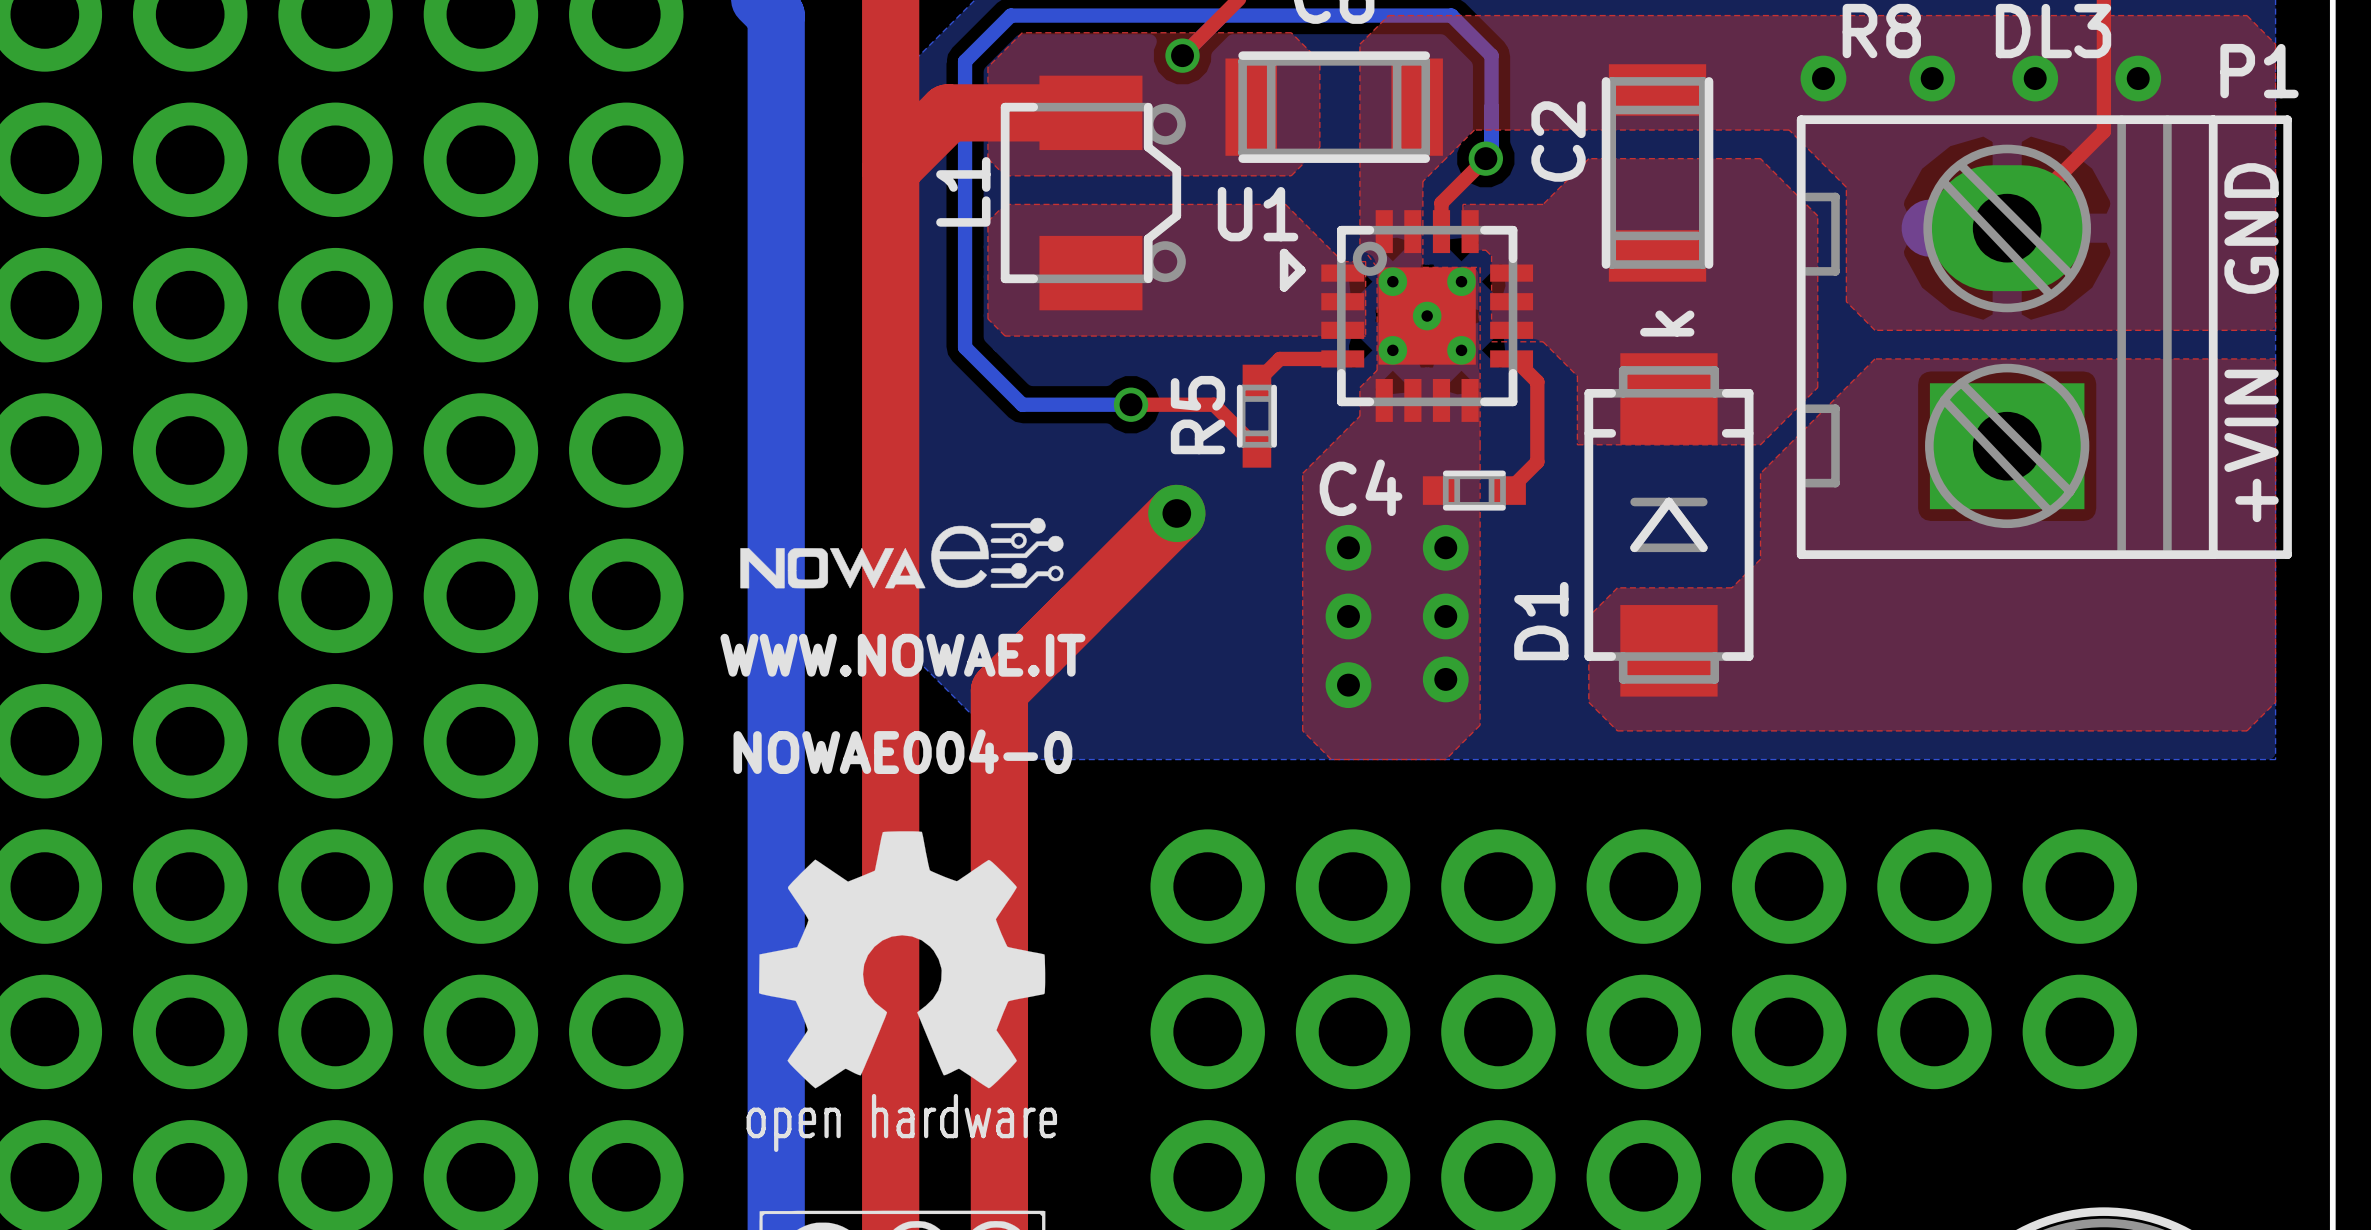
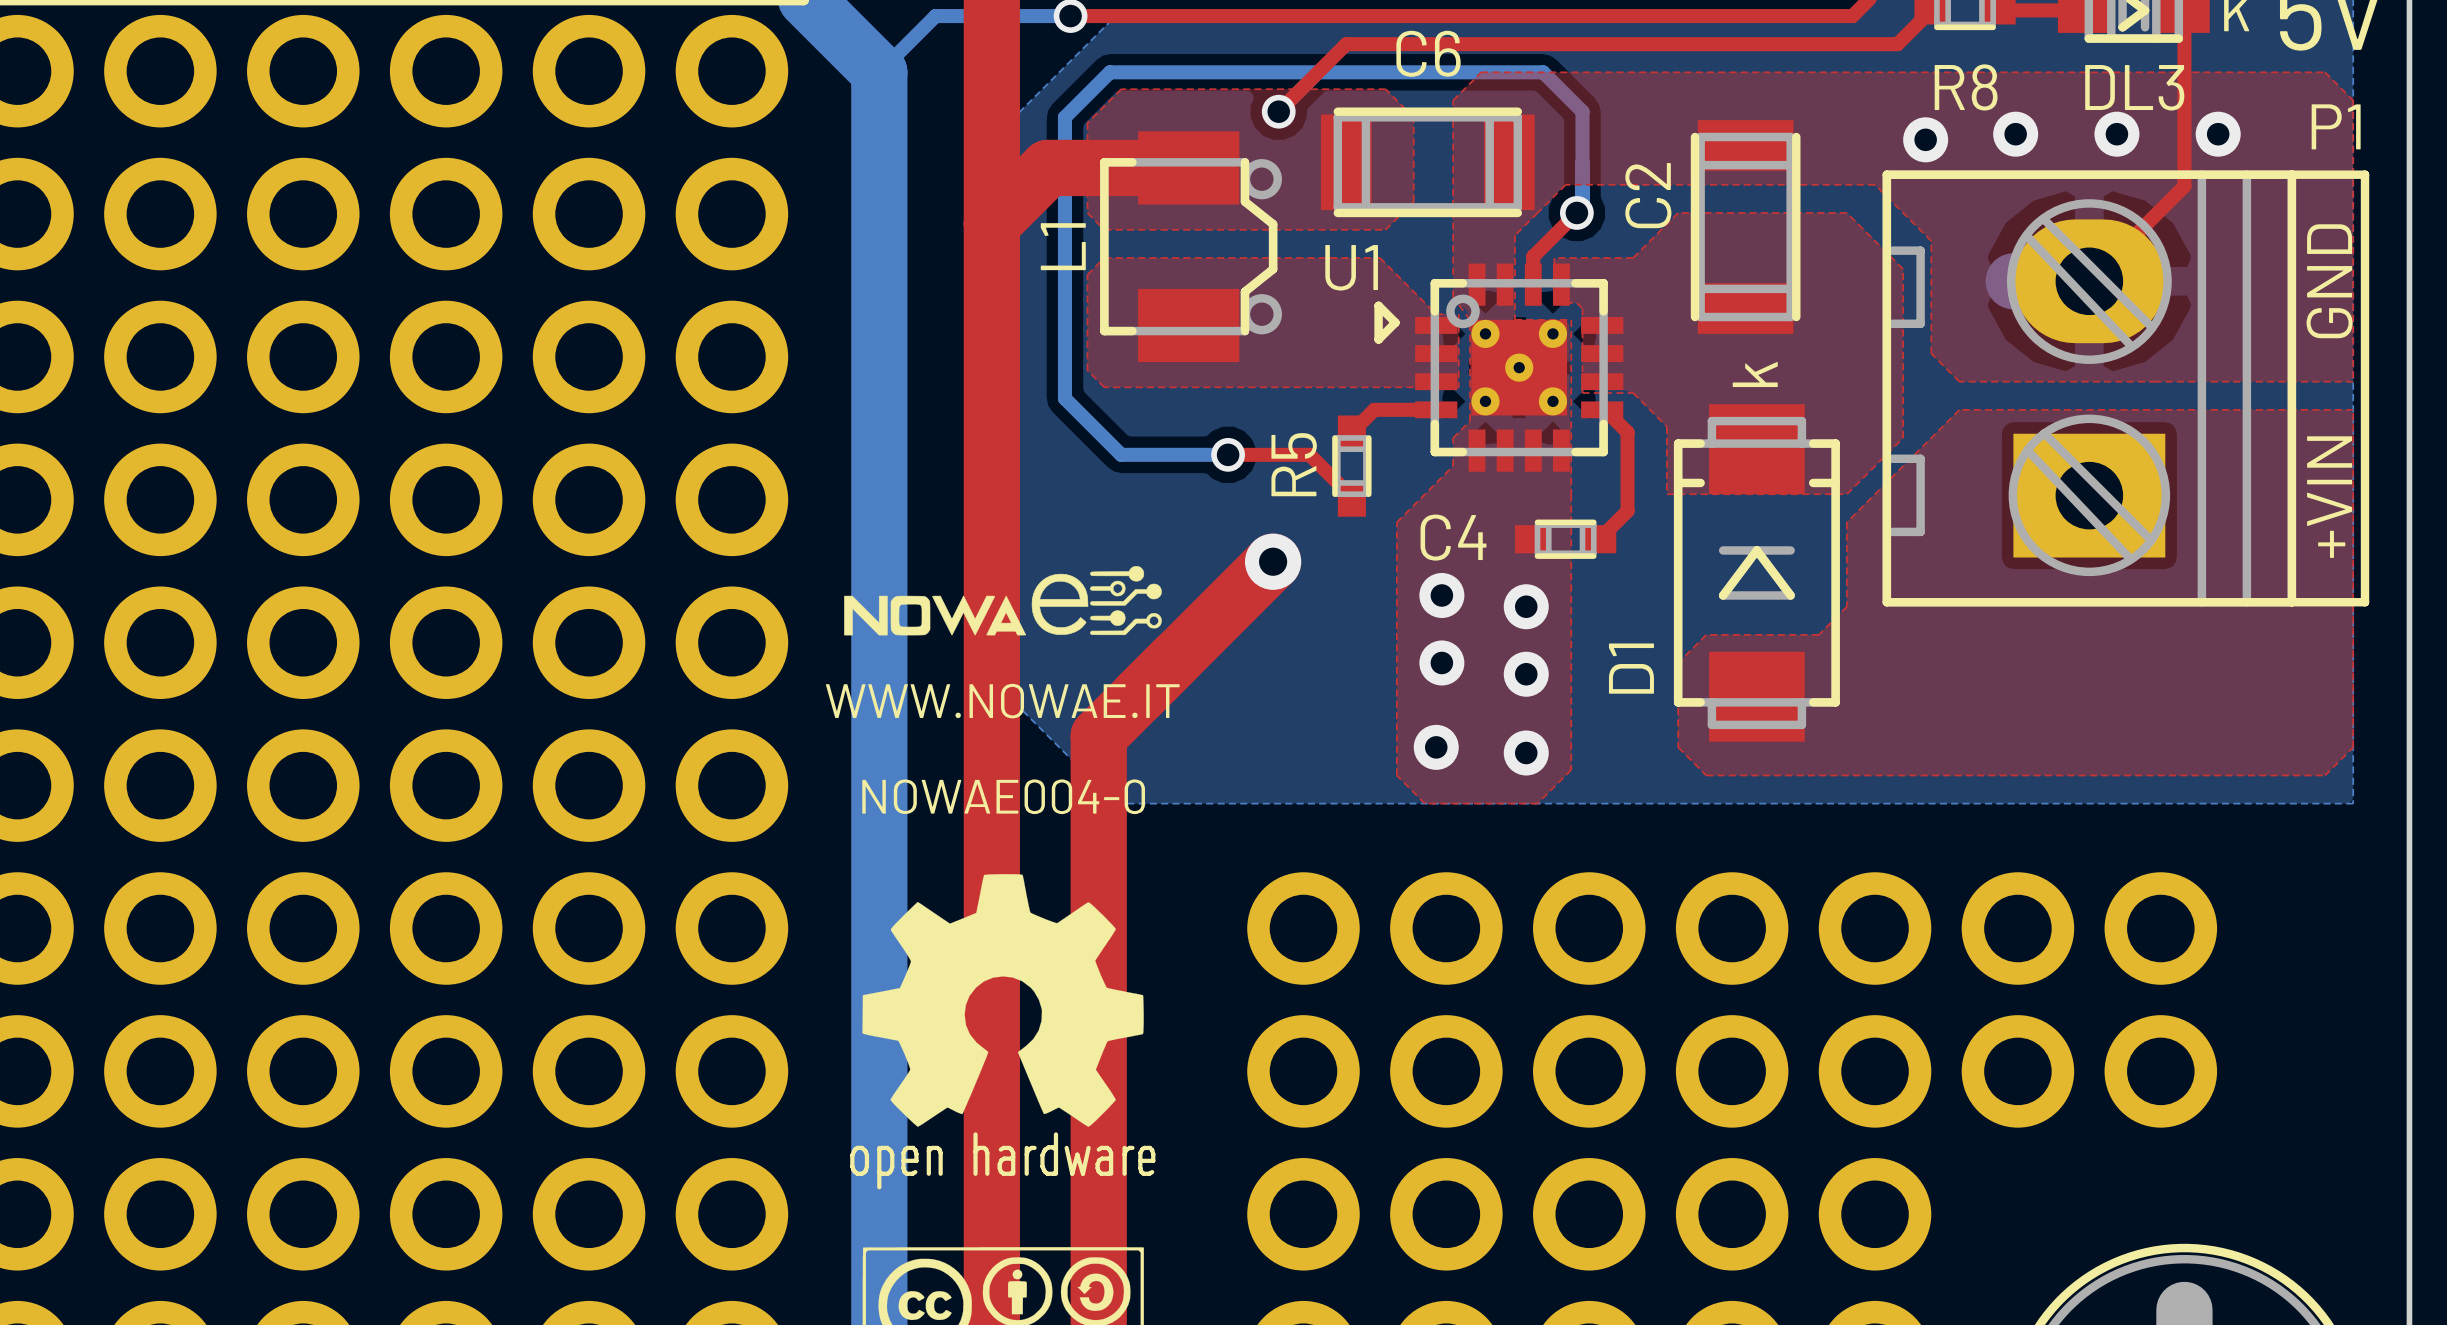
via position: (1823, 78) -> (1925, 139)
via position: (1445, 547) -> (1526, 606)
via position: (1445, 616) -> (1526, 674)
via position: (1445, 679) -> (1526, 752)
via position: (1348, 685) -> (1436, 747)

